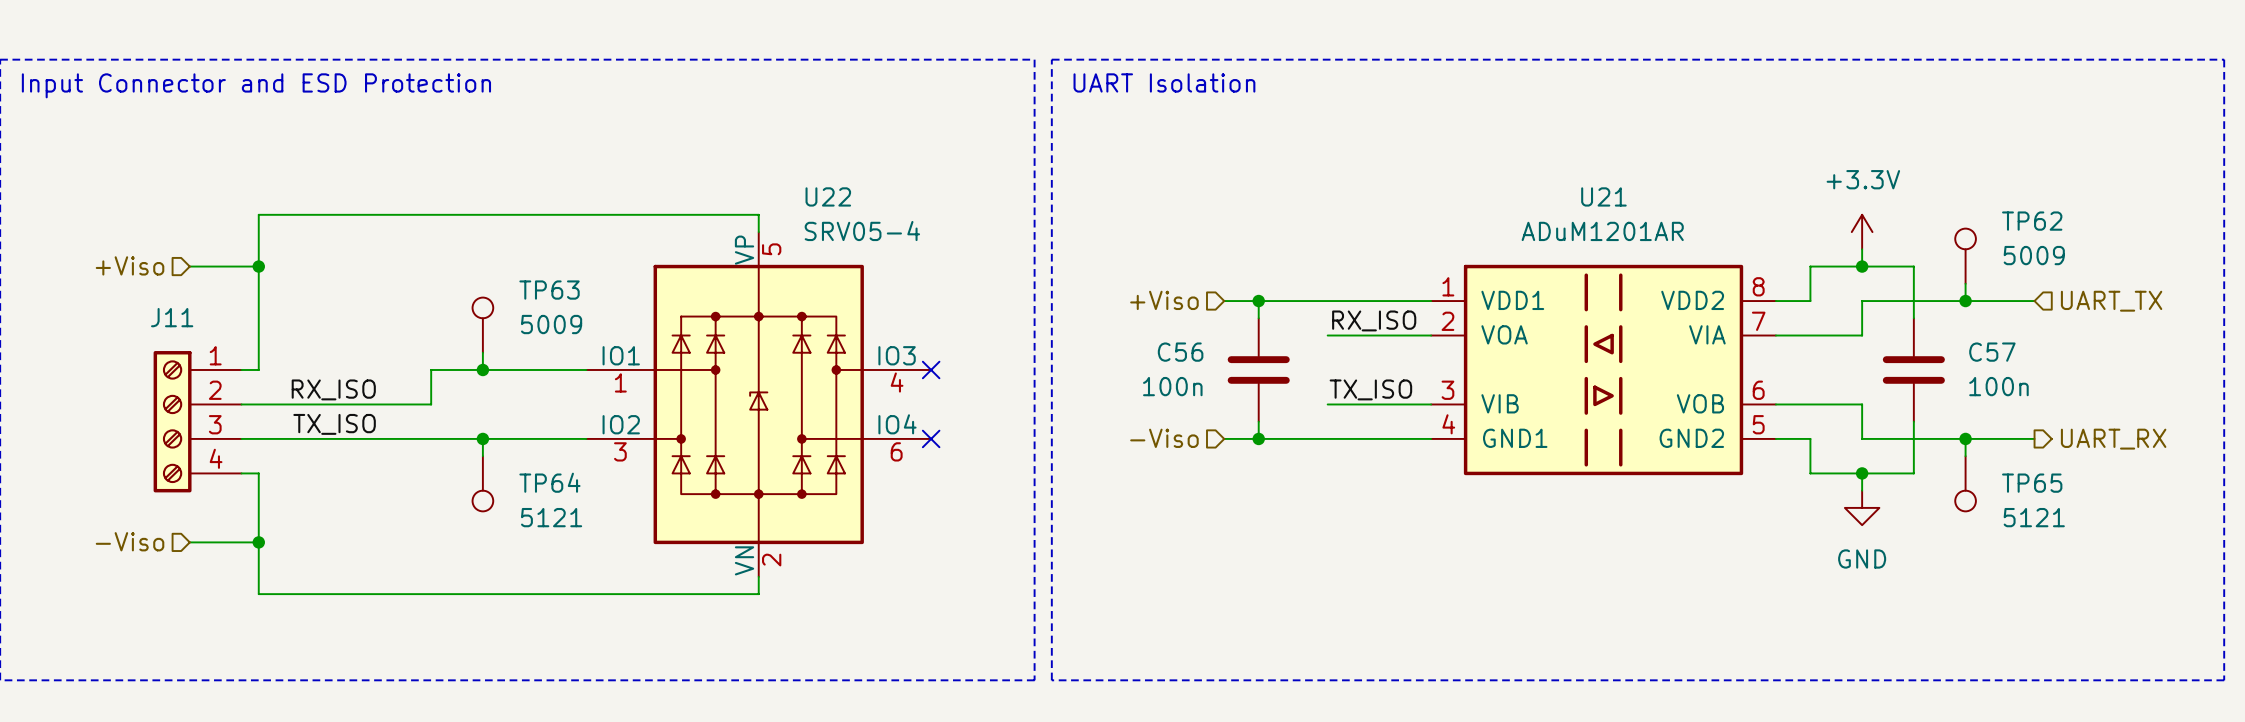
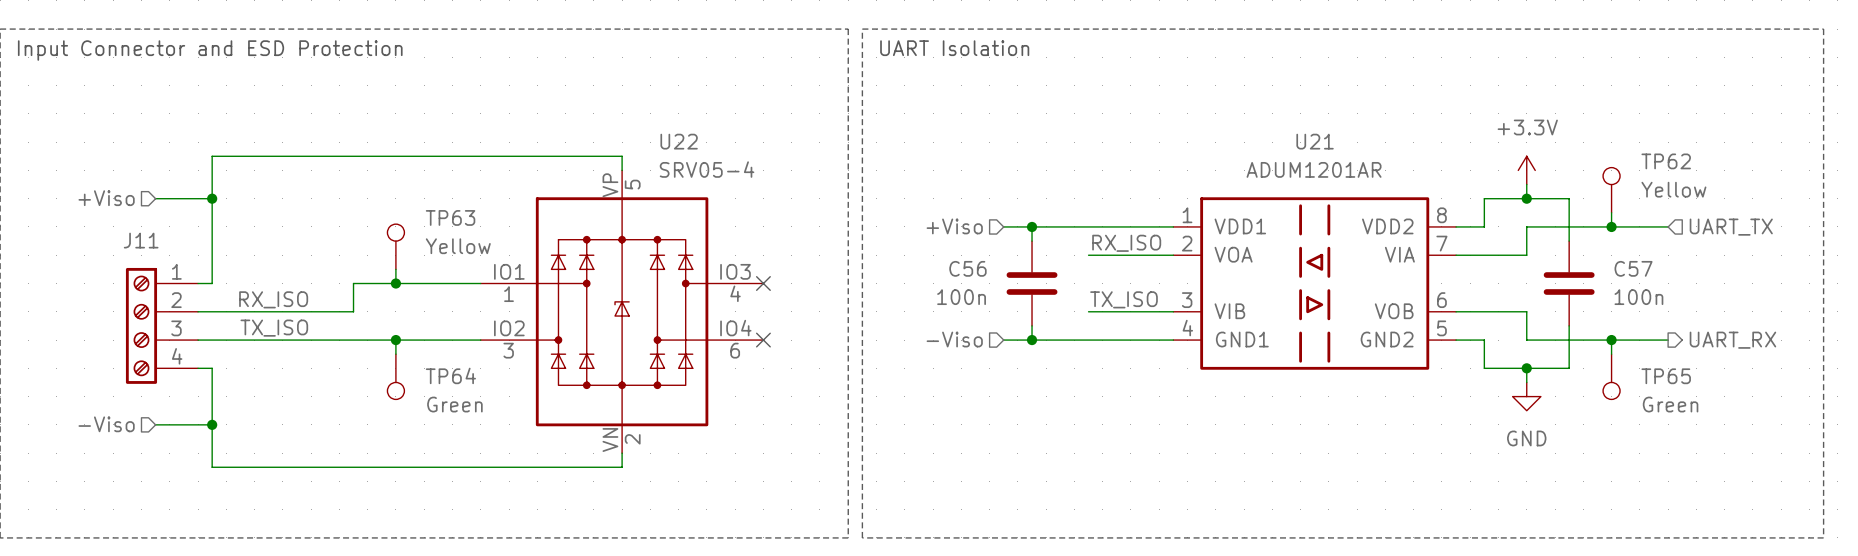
U21 value: ADuM1201AR (1602, 231) -> ADUM1201AR (1314, 169)
TP62 value: 5009 (2034, 255) -> Yellow (1673, 189)
TP63 value: 5009 (551, 324) -> Yellow (458, 246)
TP64 value: 5121 (551, 517) -> Green (454, 404)
TP65 value: 5121 (2034, 517) -> Green (1670, 404)

